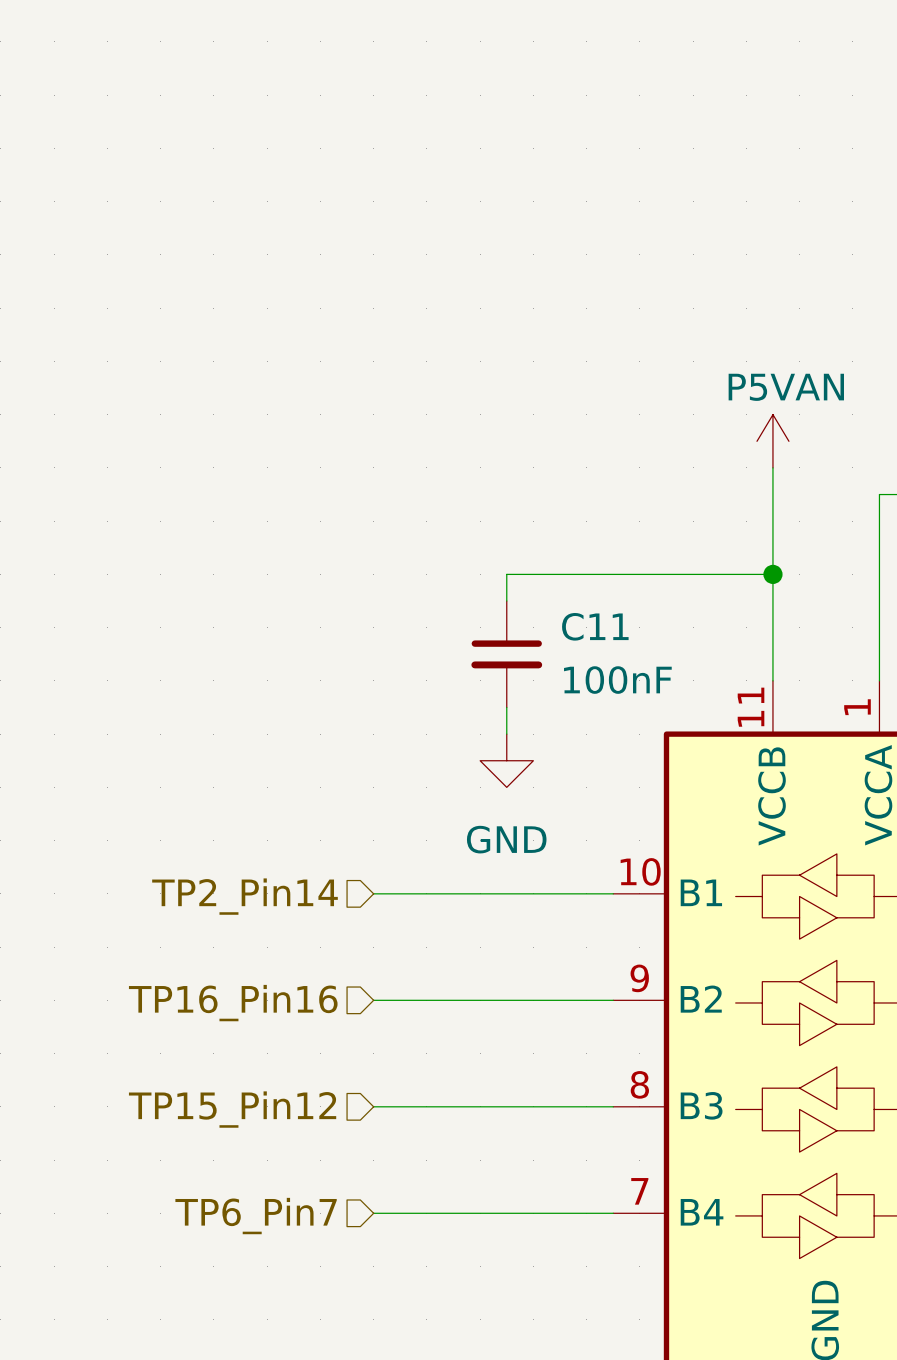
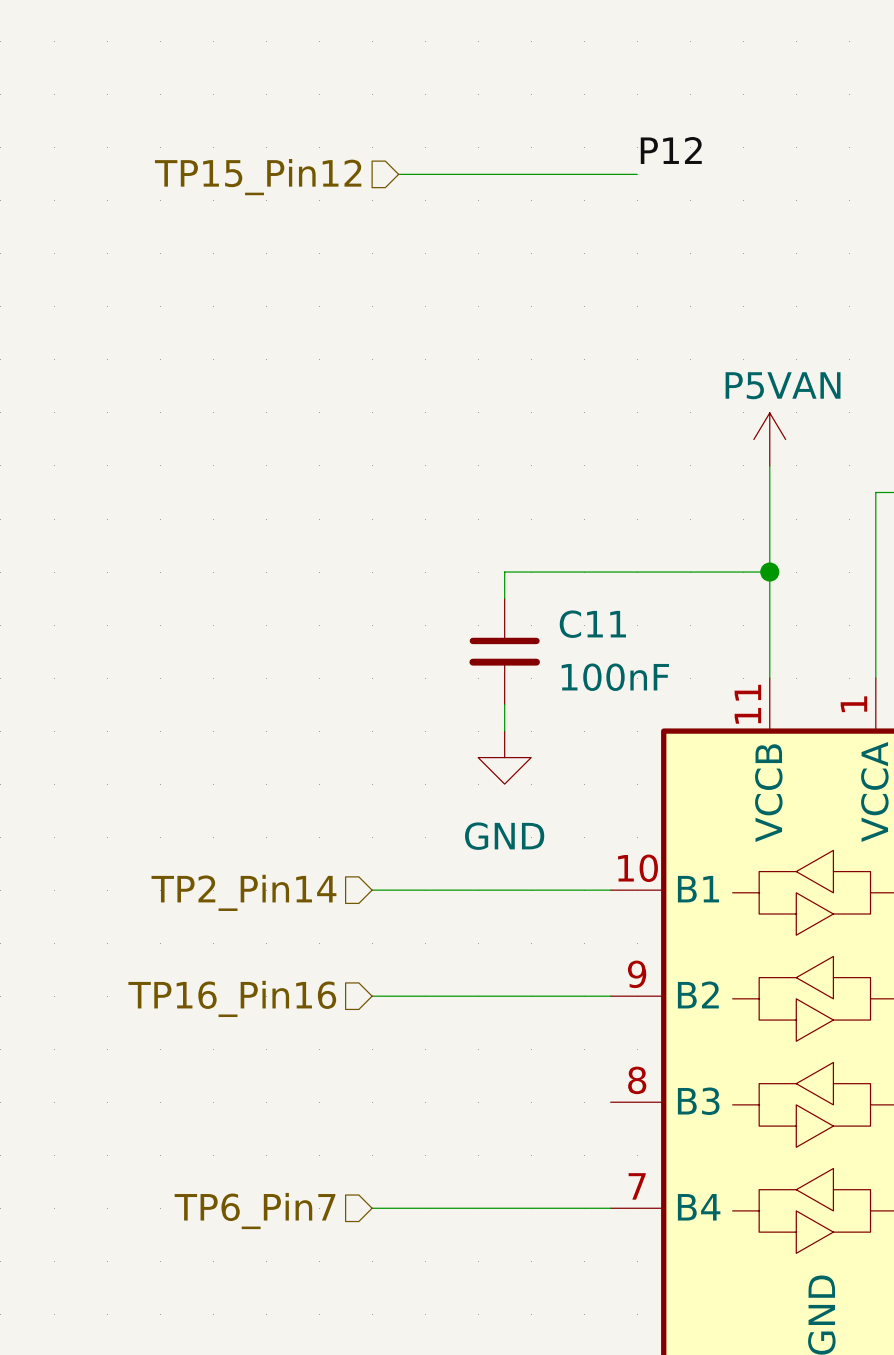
label: none -> P12 (671, 150)
wire: none -> (398, 174) (637, 174)
hierarchical label: none -> TP15_Pin12 (258, 177)
wire: (373, 1106) (613, 1106) -> none
hierarchical label: TP15_Pin12 (232, 1109) -> none

